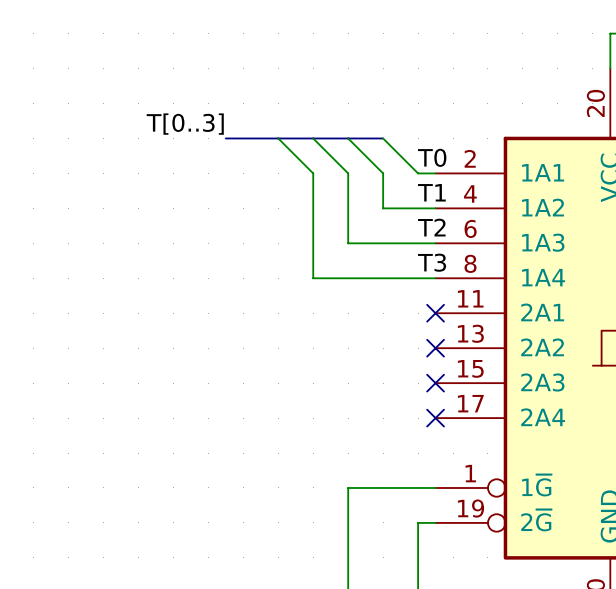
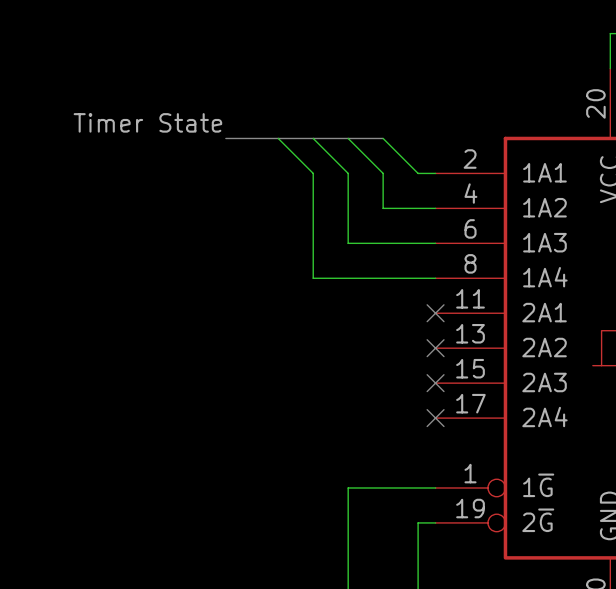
label: T[0..3] (185, 124) -> Timer State (147, 122)
label: T0 (432, 157) -> none
label: T1 (431, 192) -> none
label: T2 (431, 227) -> none
label: T3 (432, 262) -> none

